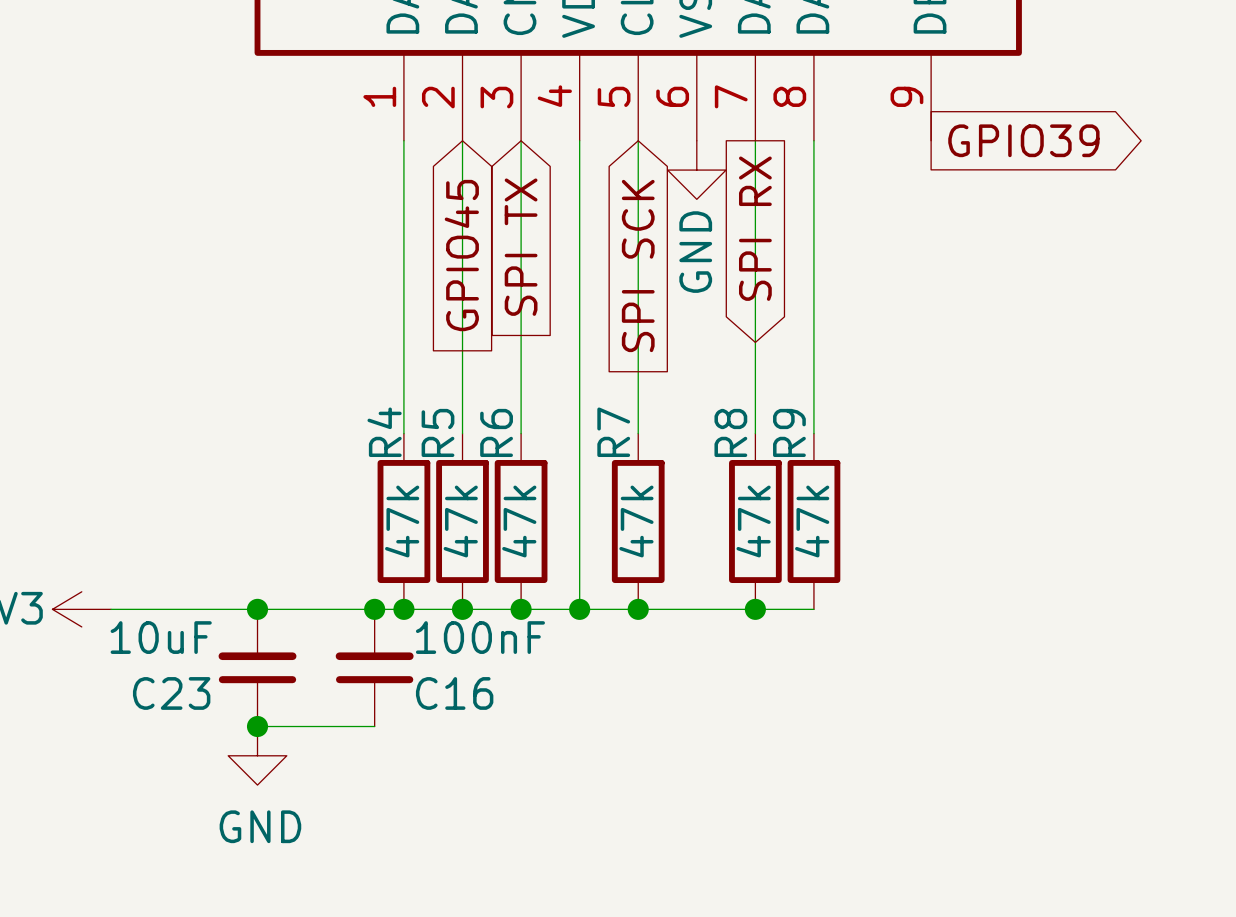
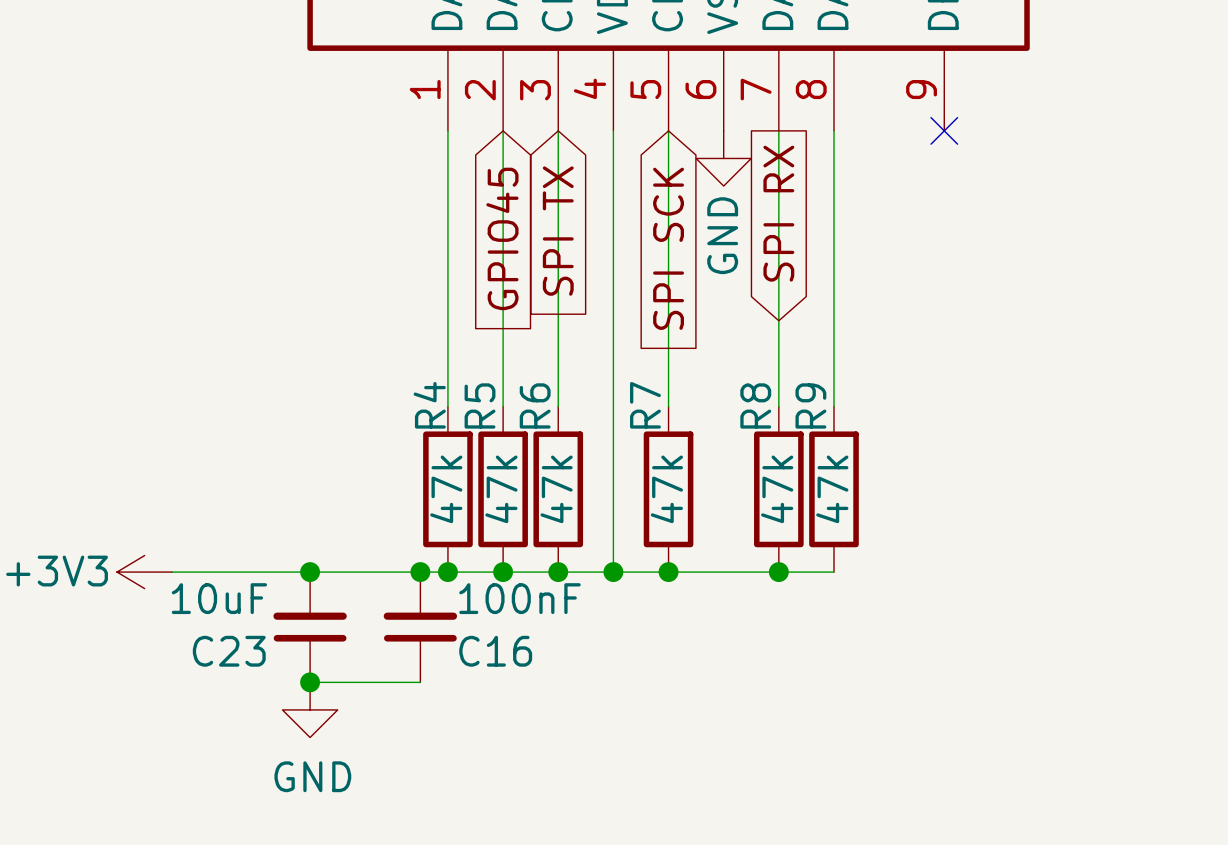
no-connect mark: none -> (944, 130)
global label: GPIO39 (1023, 140) -> none

